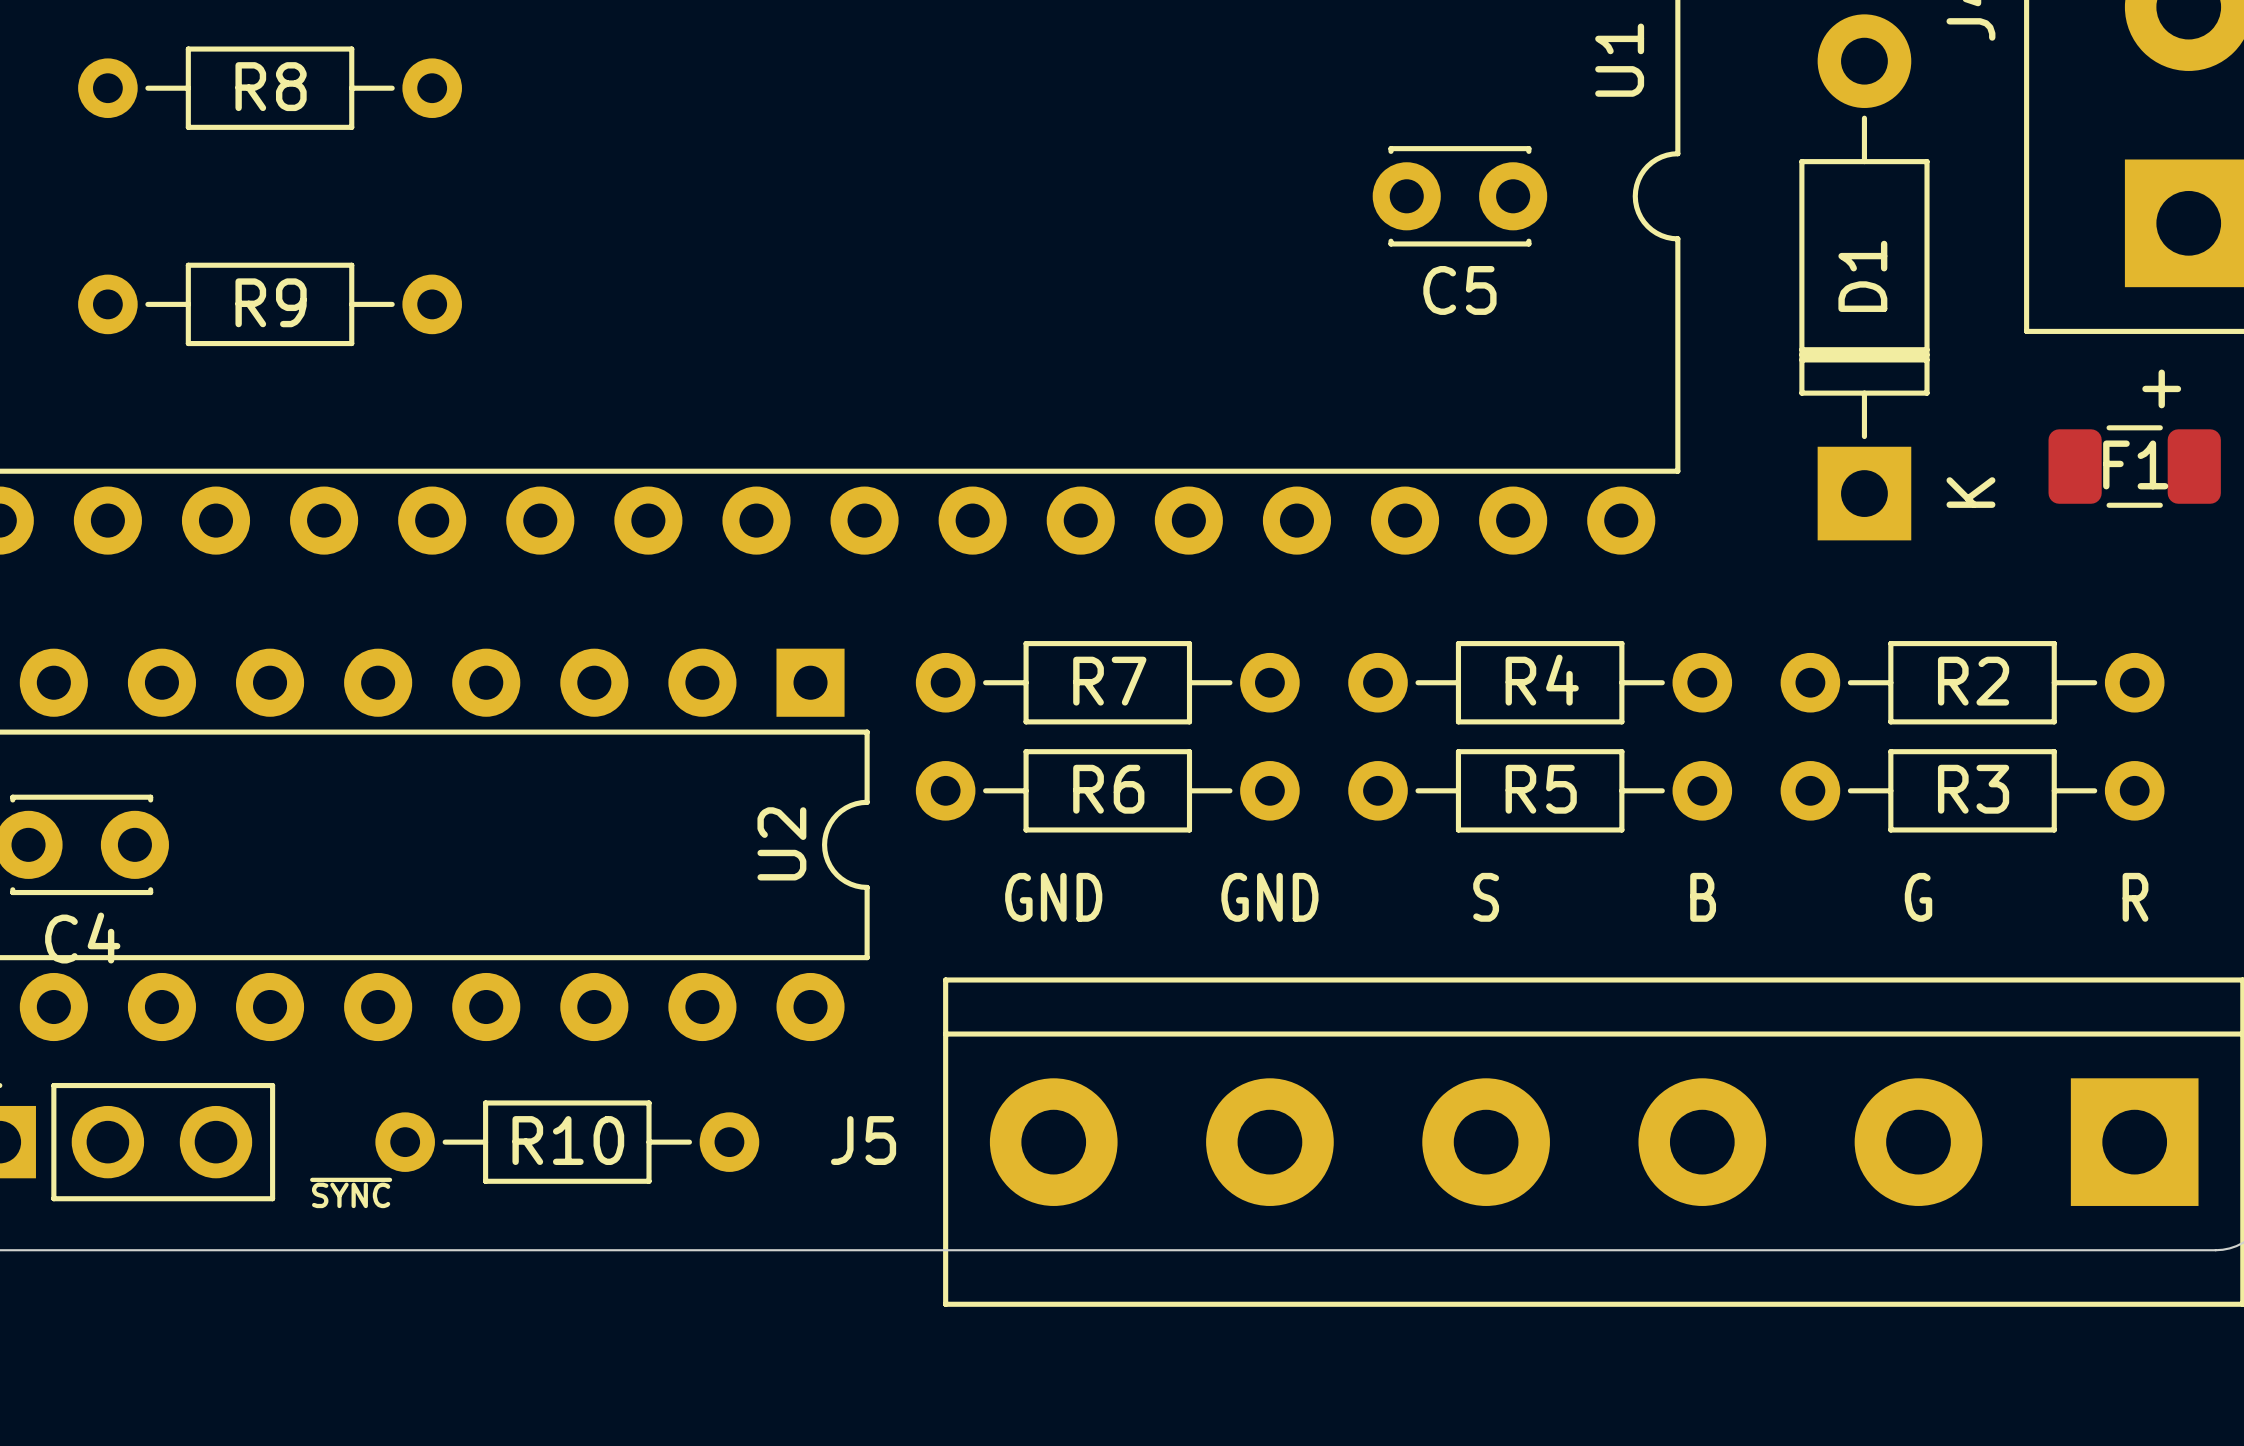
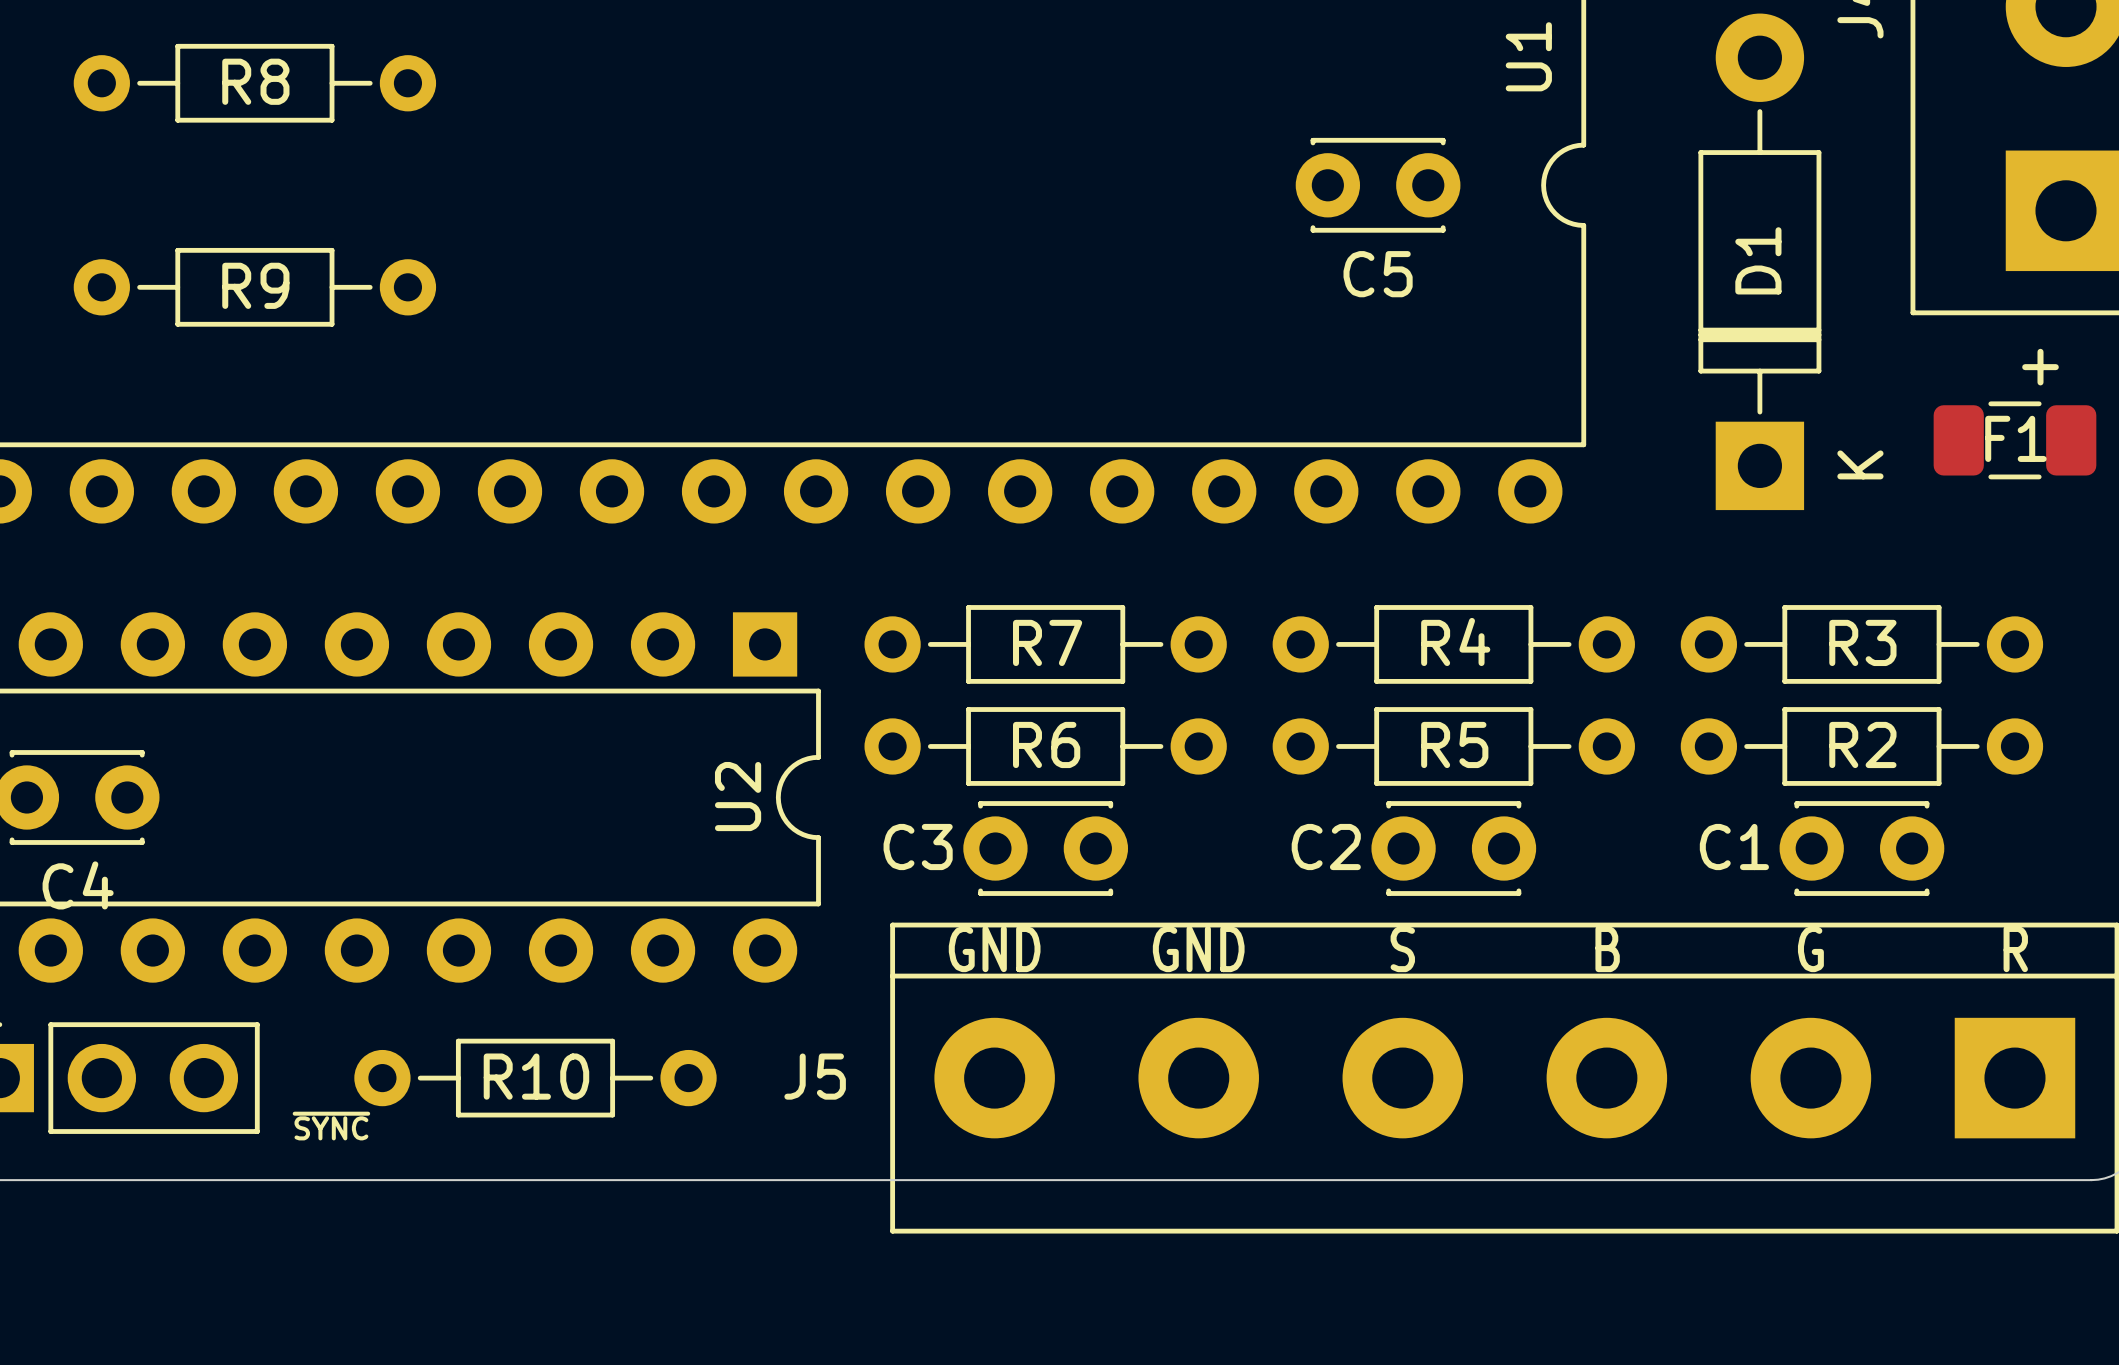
R2 name: R2 (1973, 681) -> R3 (1862, 642)
R3 name: R3 (1973, 789) -> R2 (1862, 744)
text position: GND (1053, 897) -> GND (994, 949)
text position: GND (1269, 897) -> GND (1198, 949)
text position: S (1486, 897) -> S (1402, 949)
text position: B (1703, 897) -> B (1607, 949)
text position: G (1918, 897) -> G (1810, 949)
text position: R (2135, 897) -> R (2015, 949)
C3: none -> (1045, 848)
C2: none -> (1453, 848)
C1: none -> (1861, 848)

